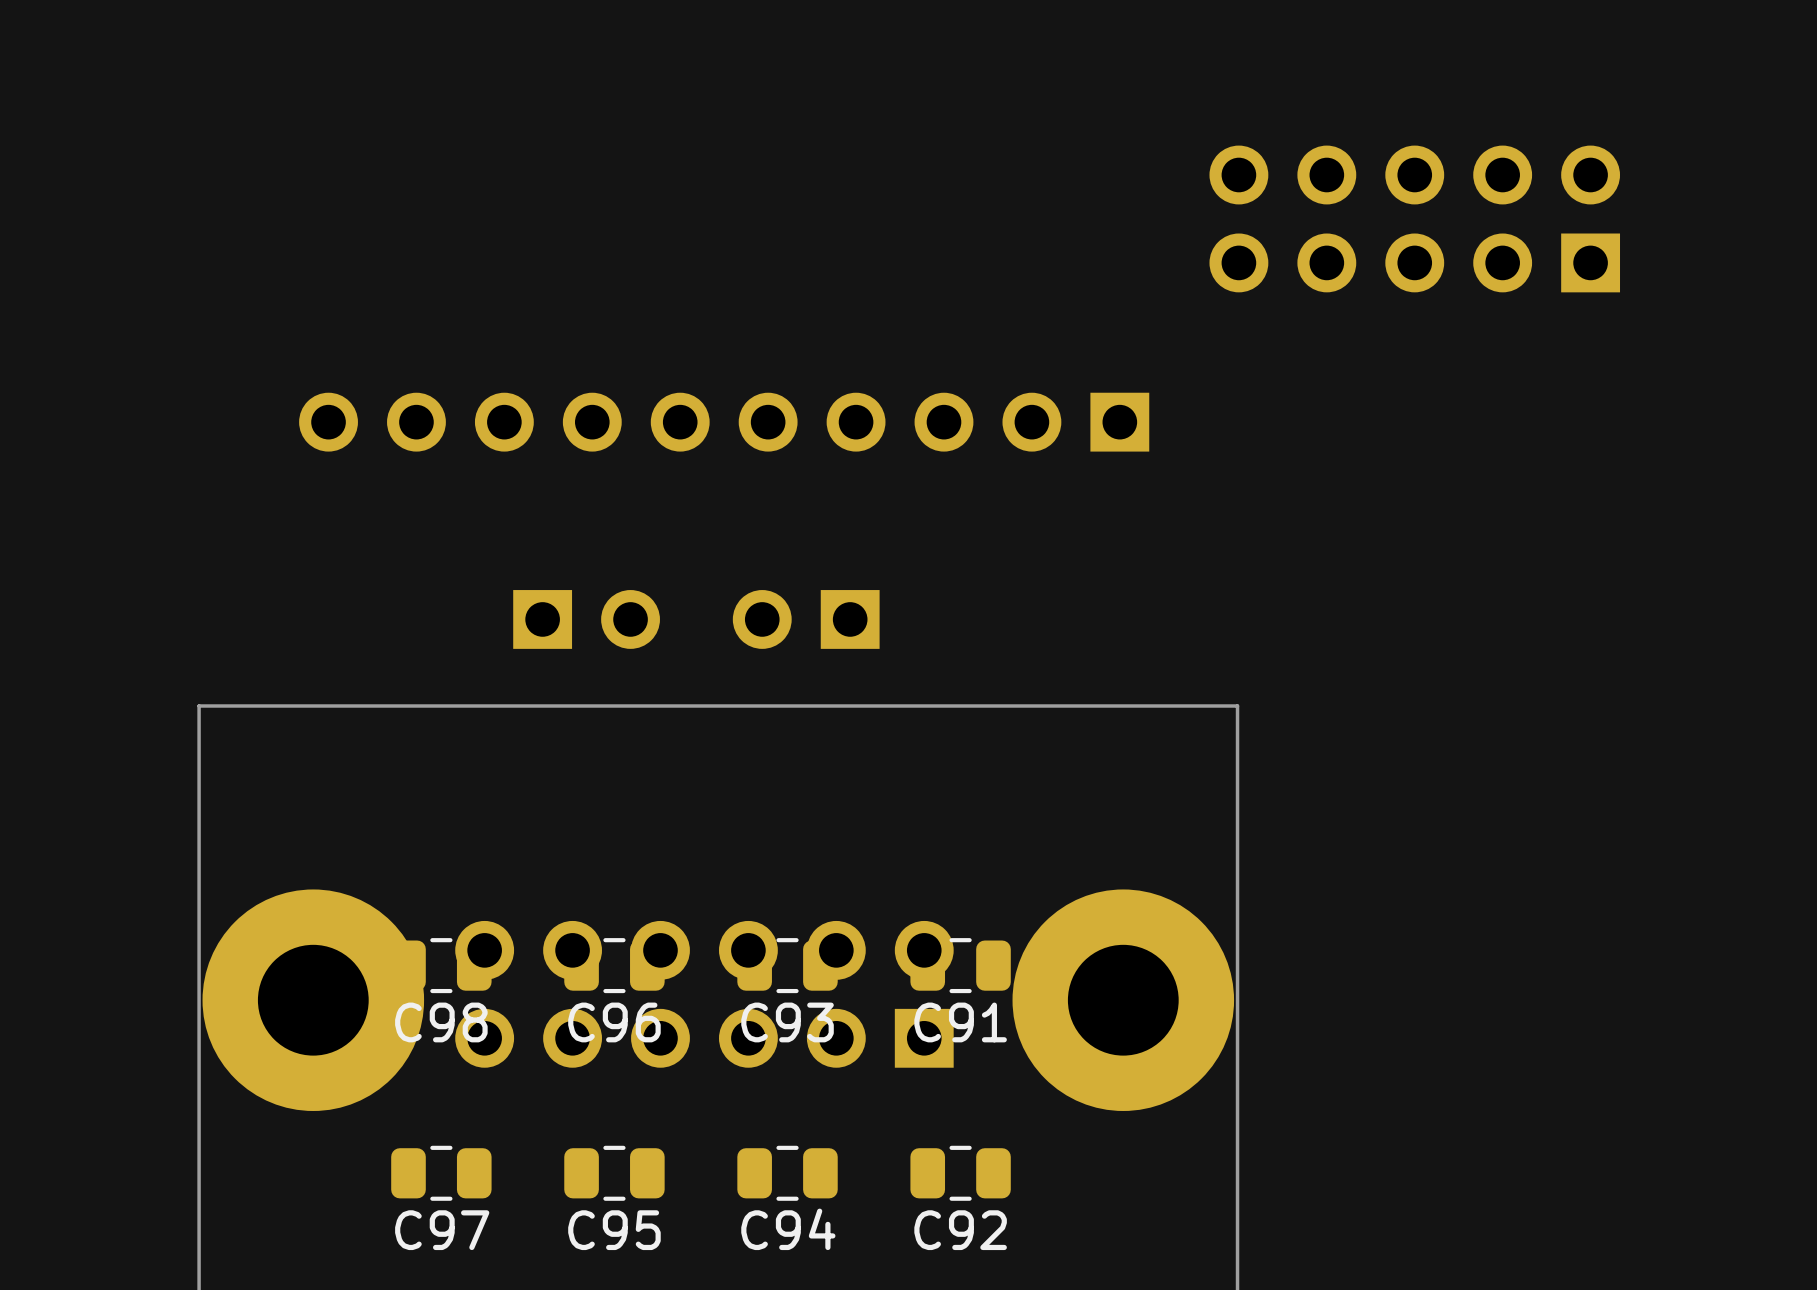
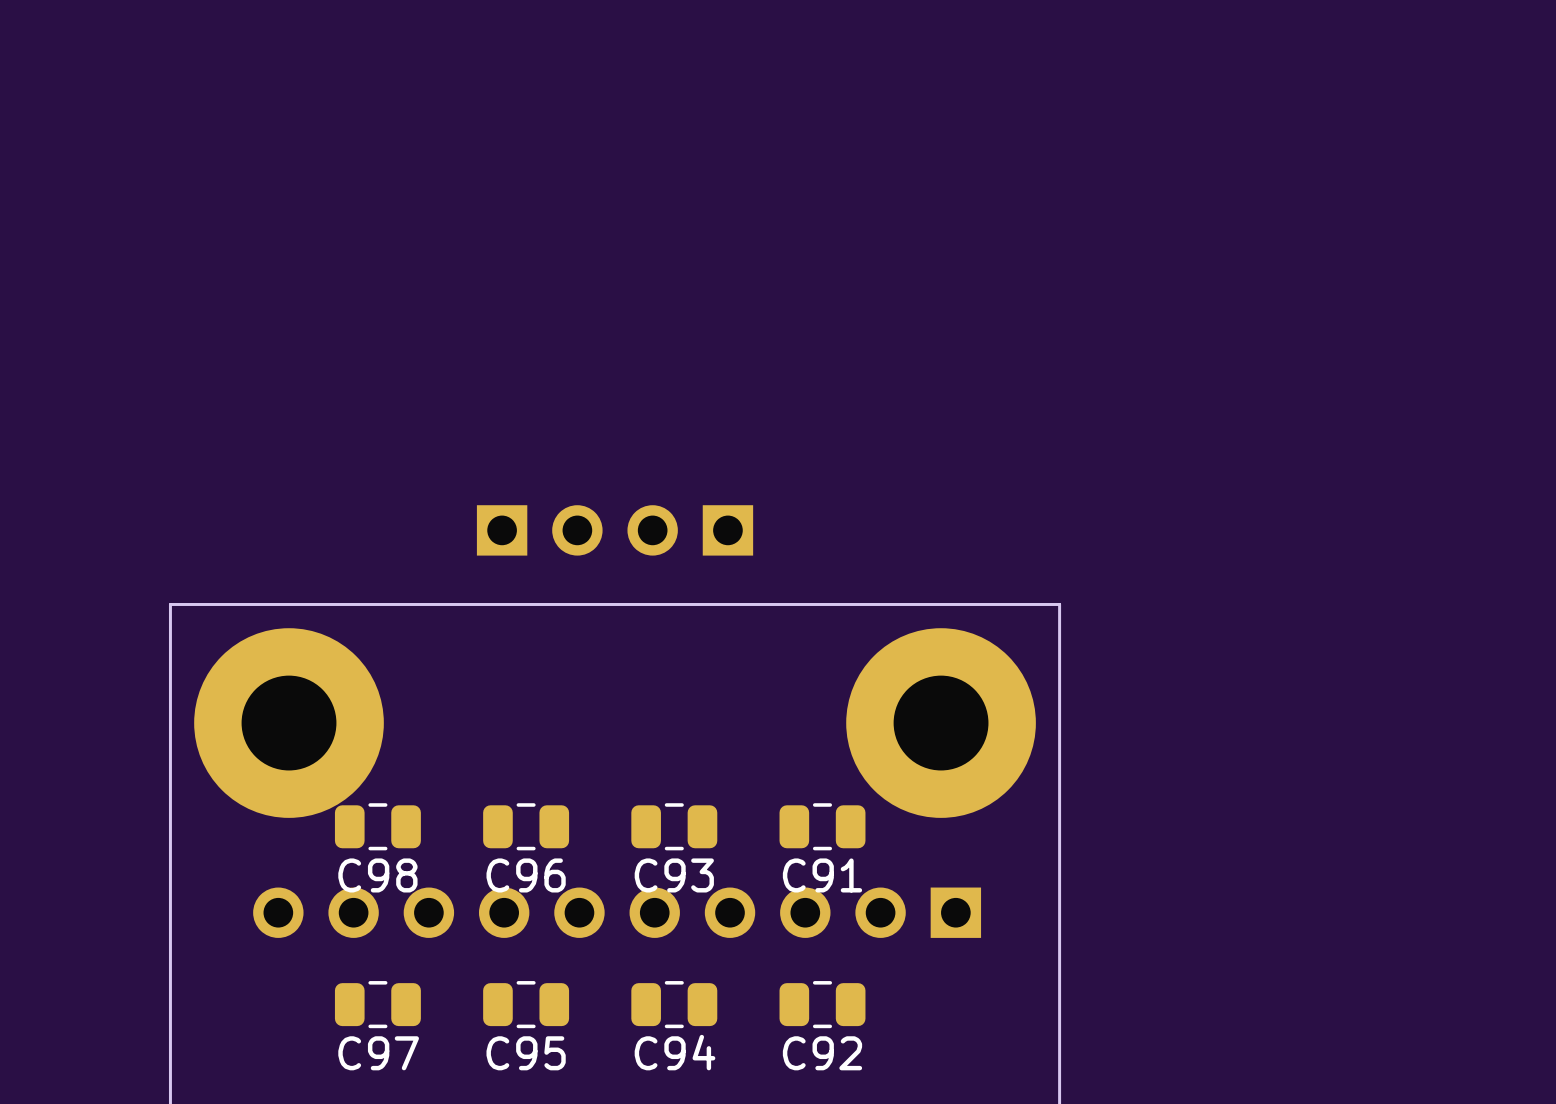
part: (1414, 218) -> none
part position: (724, 422) -> (617, 912)
part position: (586, 619) -> (539, 530)
part: (704, 994) -> none
part position: (313, 1000) -> (289, 723)
part position: (1123, 1000) -> (941, 723)

